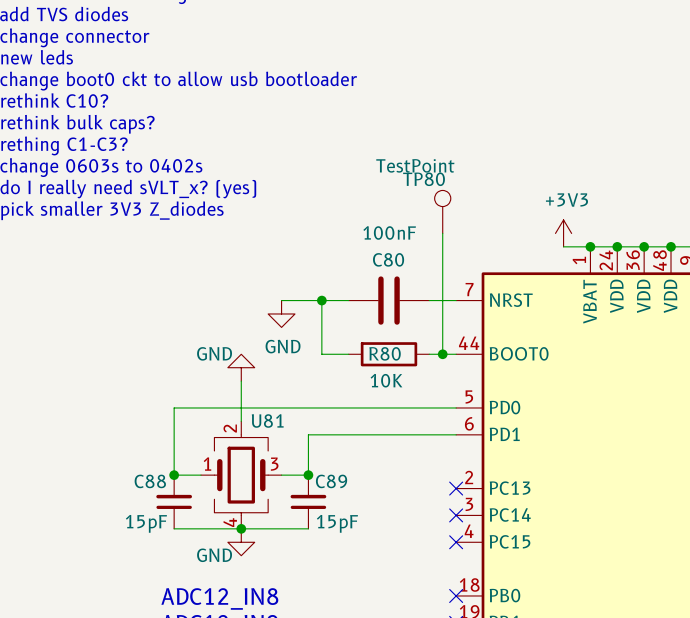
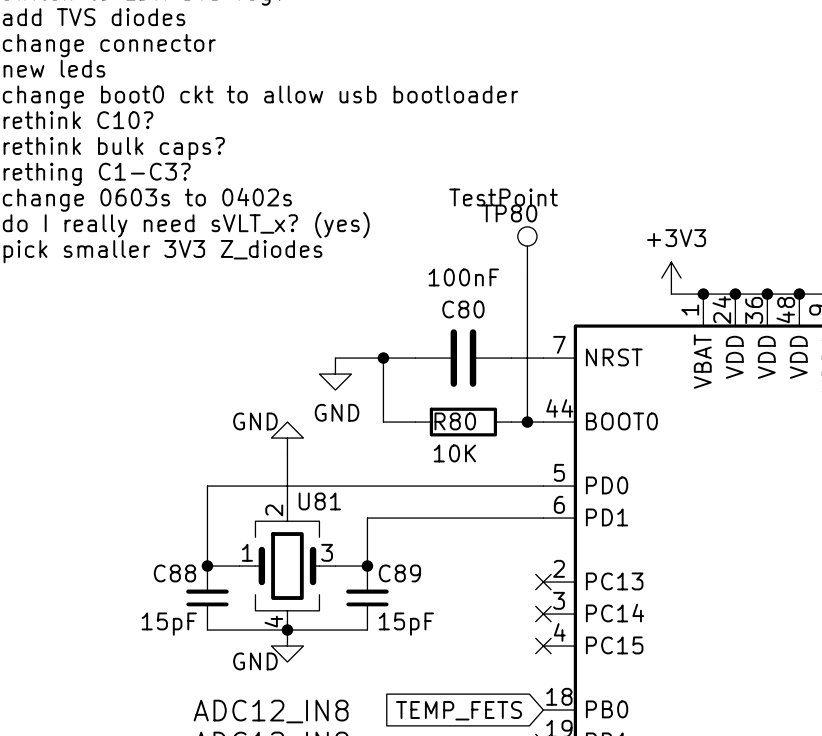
no-connect mark: (456, 595) -> none
global label: none -> TEMP_FETS (459, 710)

